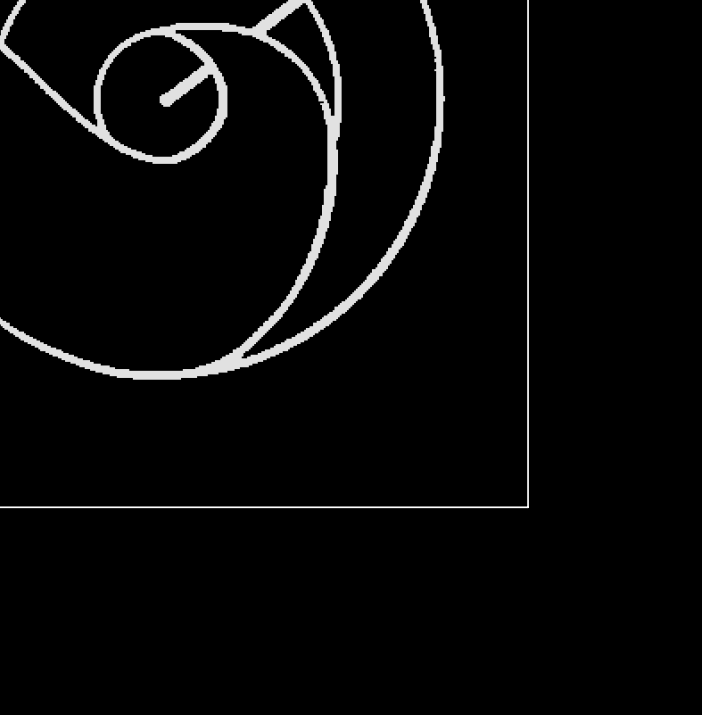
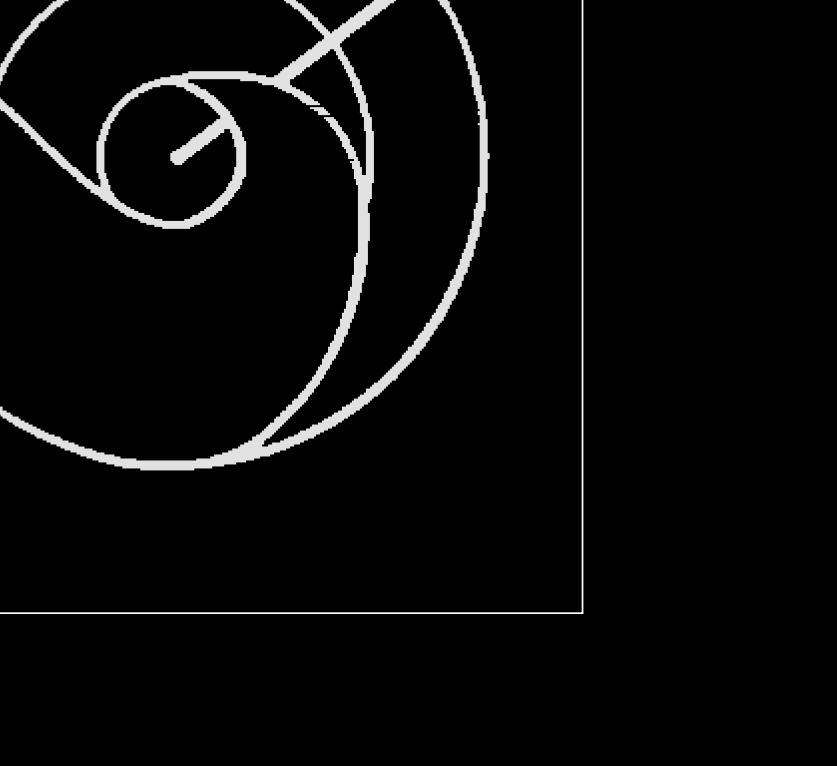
drawing: [284, 53, 305, 64] -> none

